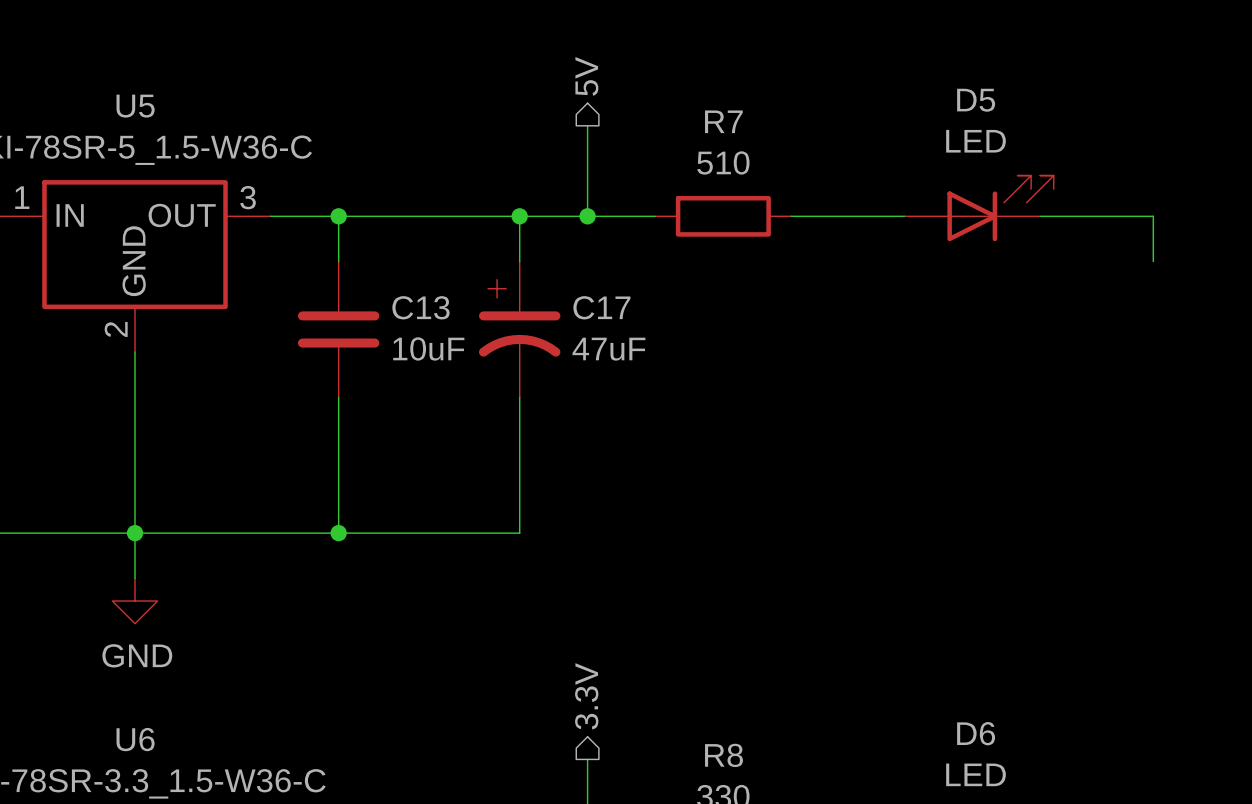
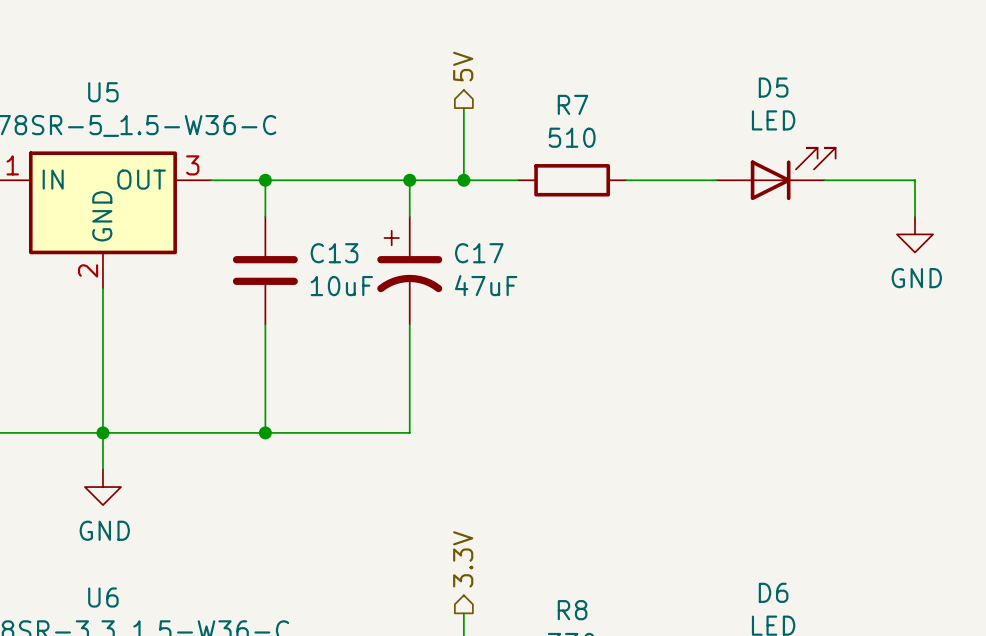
power symbol: none -> GND (914, 234)

